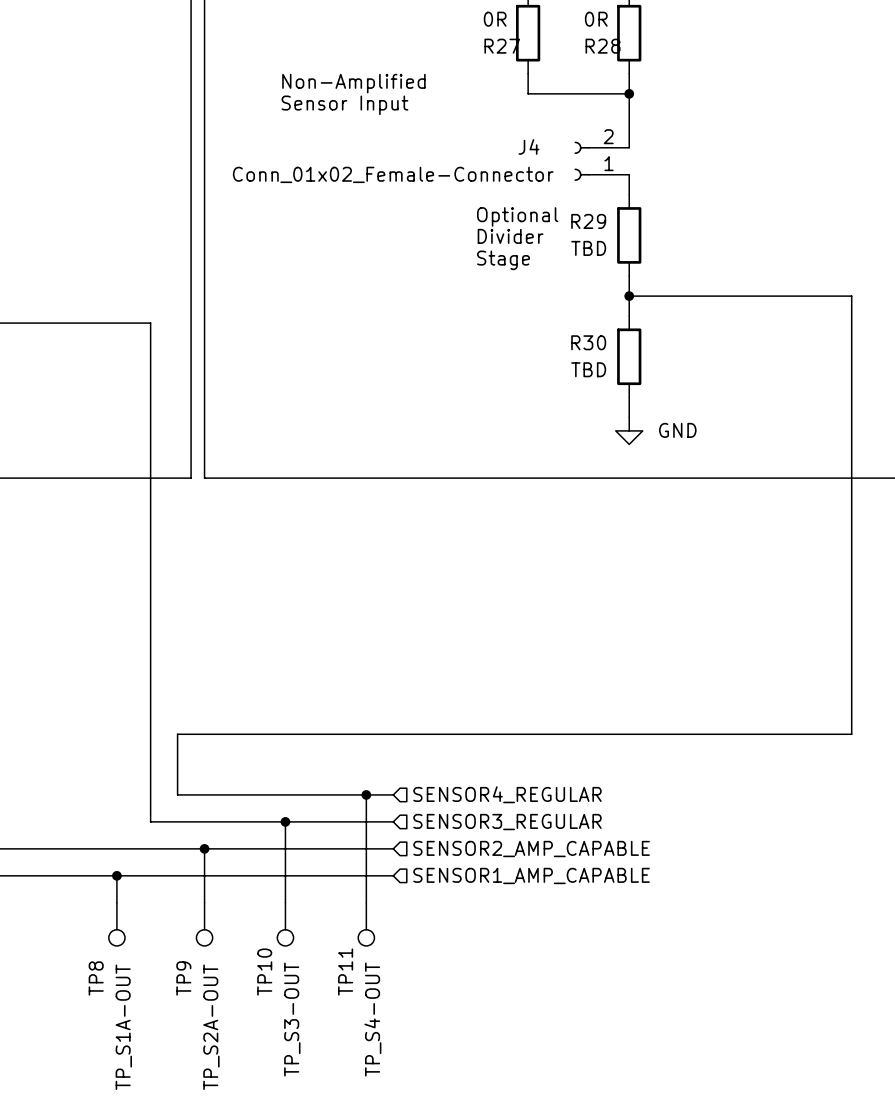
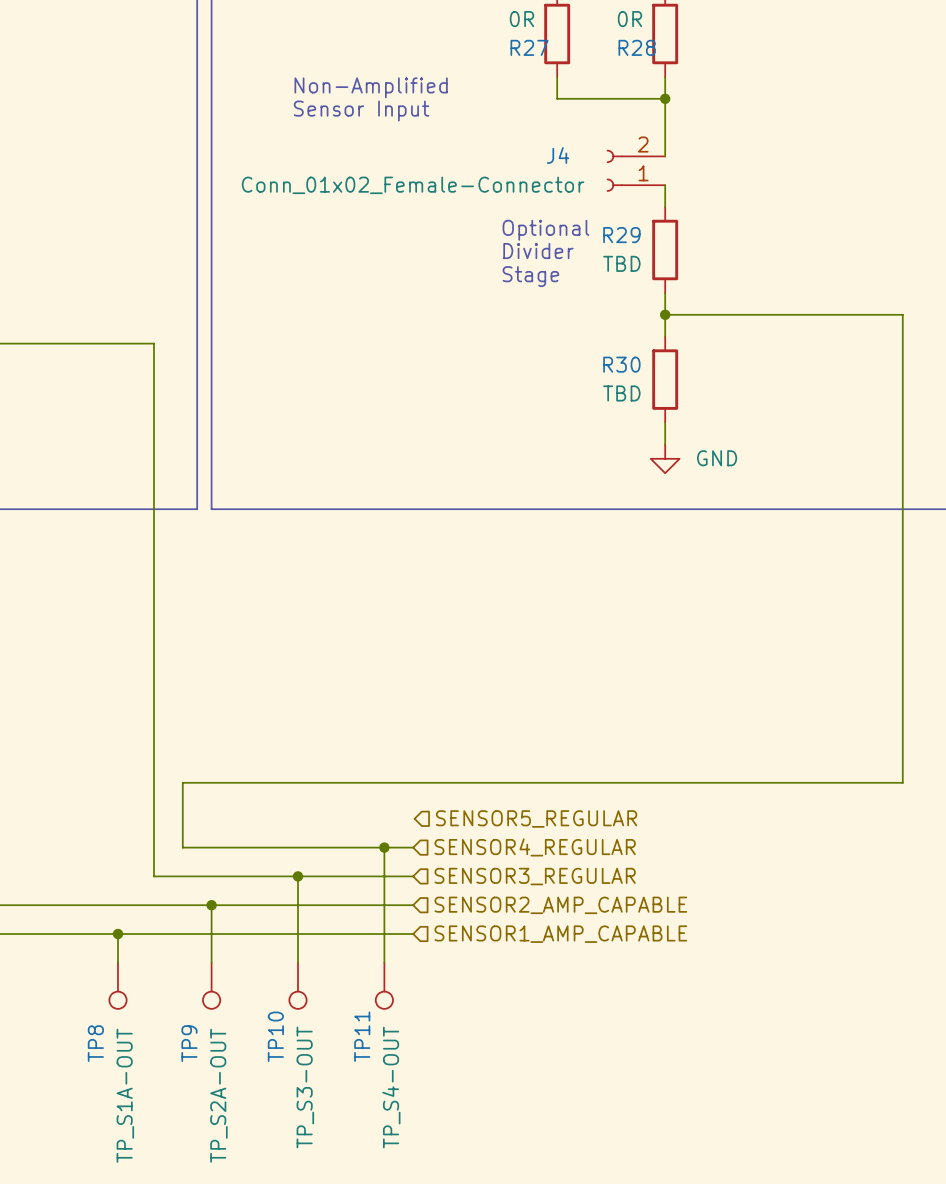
hierarchical label: none -> SENSOR5_REGULAR (536, 818)

